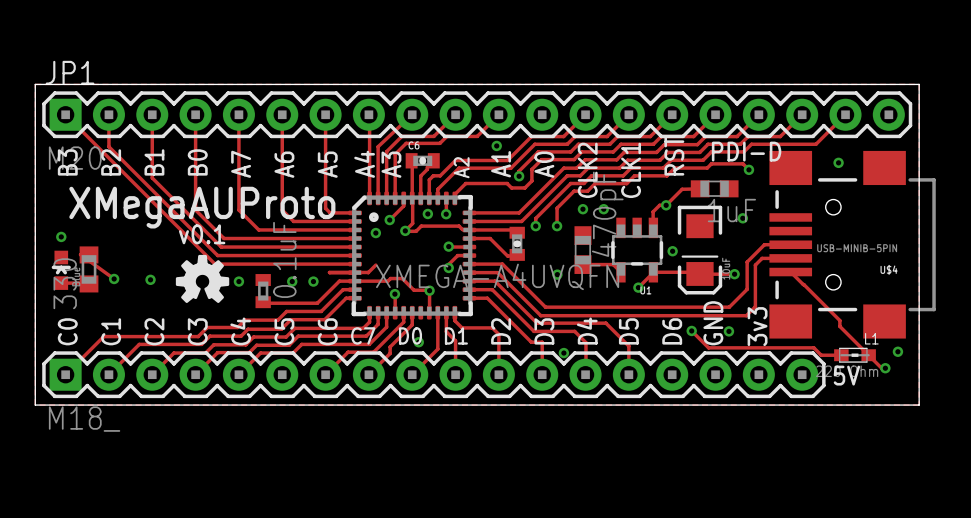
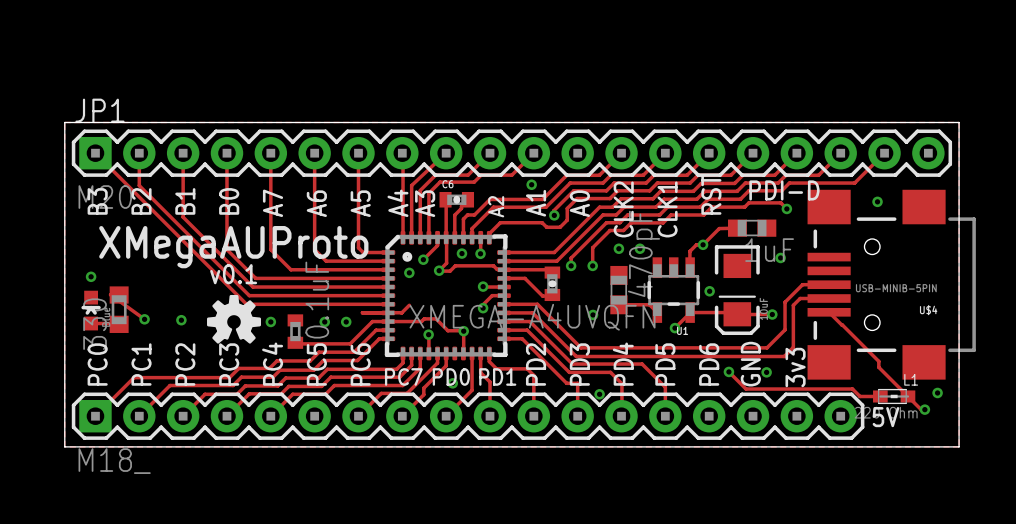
text: C0 (67, 331) -> PC0 (97, 364)
text: C1 (111, 331) -> PC1 (141, 364)
text: C2 (154, 331) -> PC2 (185, 364)
text: C3 (197, 331) -> PC3 (229, 364)
text: C4 (240, 331) -> PC4 (272, 364)
text: C5 (284, 331) -> PC5 (316, 364)
text: C6 (327, 331) -> PC6 (360, 364)
text: D2 (501, 331) -> PD2 (536, 364)
text: D3 (544, 331) -> PD3 (579, 364)
text: D4 (587, 331) -> PD4 (623, 364)
text: D5 (628, 331) -> PD5 (665, 364)
text: D6 (672, 331) -> PD6 (709, 364)
text: C7 (363, 335) -> PC7 (403, 376)
text: D0 (410, 335) -> PD0 (451, 376)
text: D1 (456, 335) -> PD1 (497, 376)

